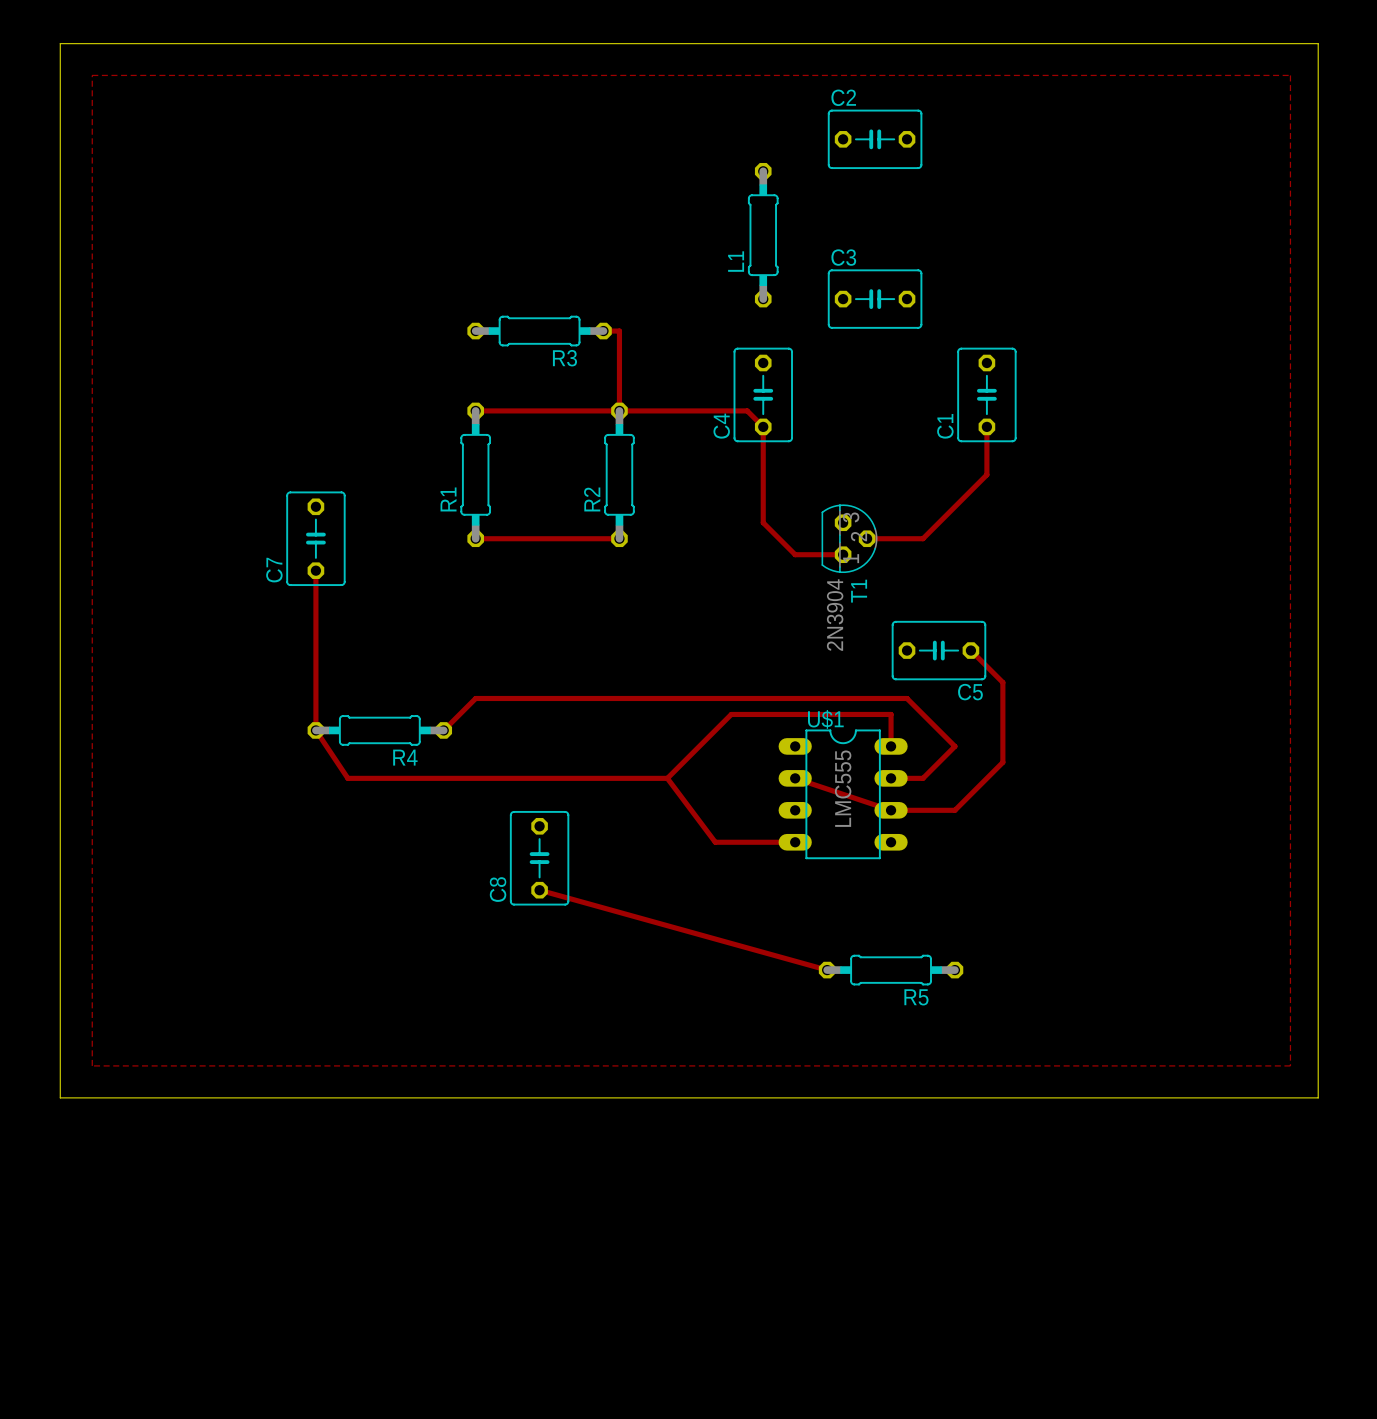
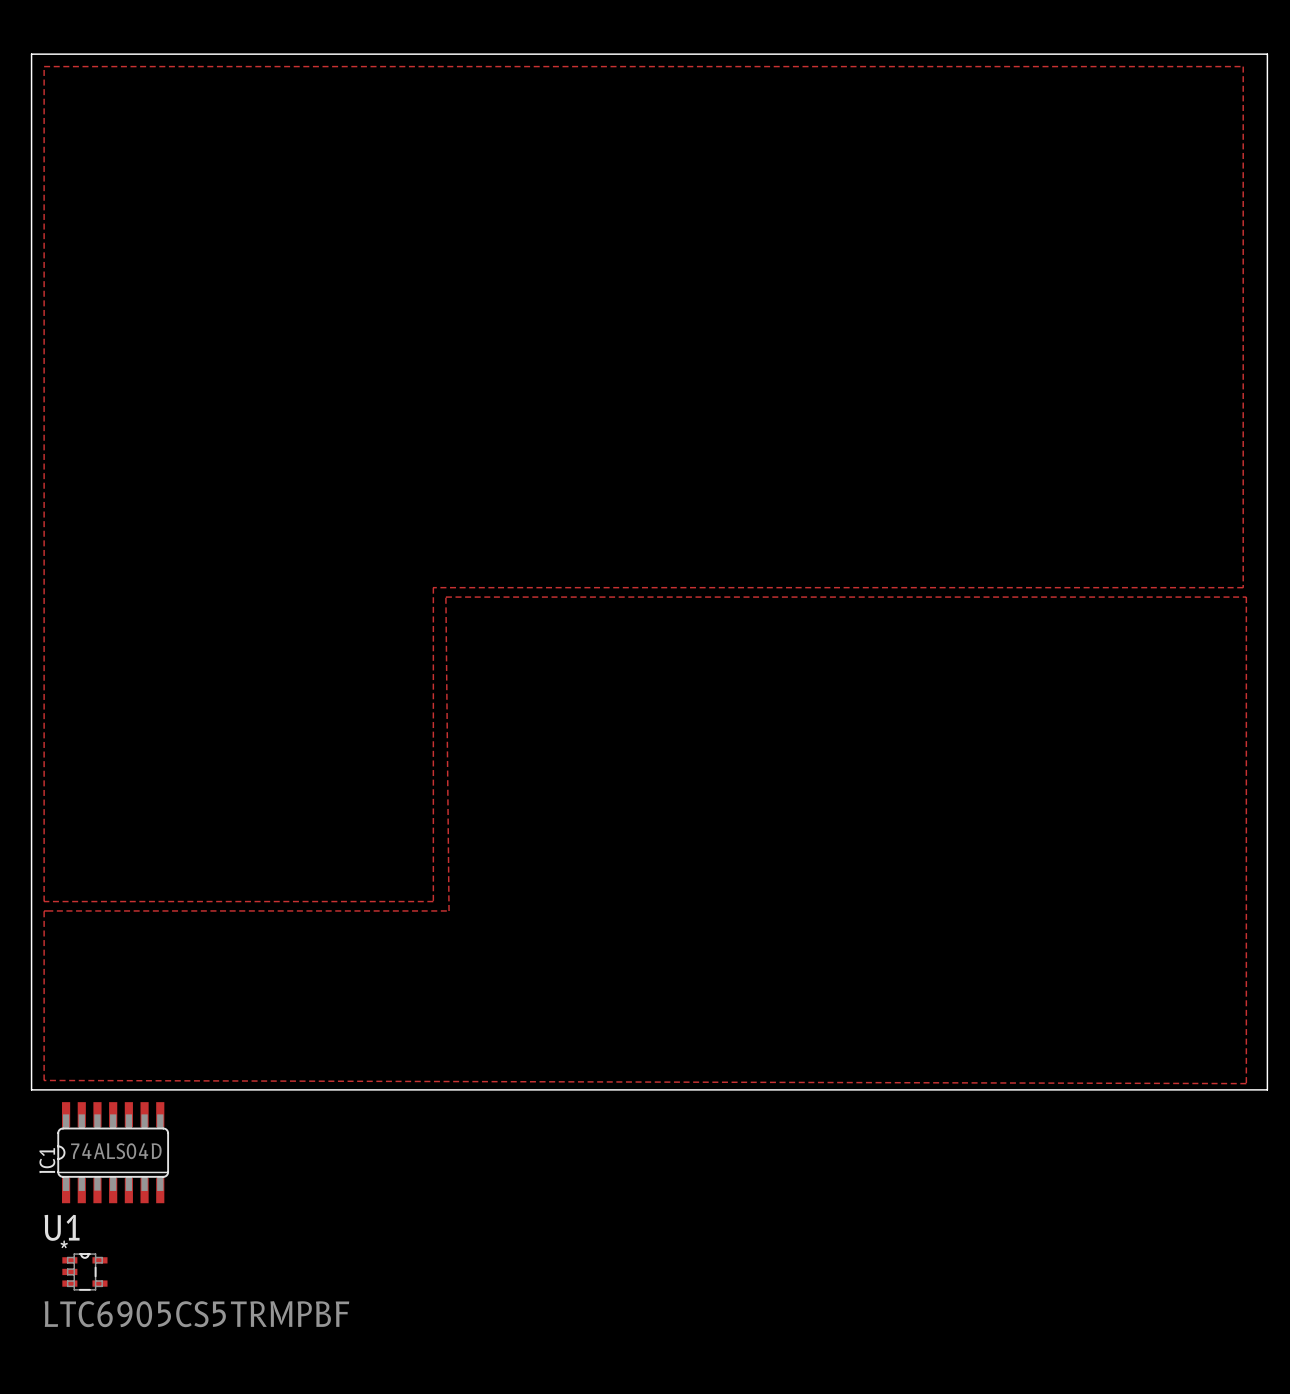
zone outline: (92, 75) (1290, 75) (1290, 1065) (92, 1065) (92, 75) -> (44, 66) (44, 901) (433, 901) (433, 587) (1243, 587) (1243, 66) (44, 66)
C2: (875, 139) -> none
L1: (763, 235) -> none
C3: (875, 299) -> none
R3: (539, 331) -> none
track: (603, 331) (619, 331) (619, 410) -> none
C4: (763, 394) -> none
C1: (986, 394) -> none
track: (475, 410) (747, 410) (763, 426) (763, 522) (795, 554) (843, 554) -> none
track: (986, 426) (986, 474) (923, 538) (868, 538) -> none
R1: (475, 474) -> none
R2: (619, 474) -> none
C7: (315, 538) -> none
track: (475, 538) (619, 538) -> none
T1: 2N3904 (849, 538) -> none
track: (315, 570) (315, 730) (347, 778) (667, 778) -> none
zone outline: none -> (445, 597) (449, 910) (44, 910) (44, 1080) (1246, 1083) (1246, 597) (445, 597)
C5: (938, 650) -> none
track: (970, 650) (1002, 682) (1002, 762) (954, 810) (891, 810) (795, 778) -> none
R4: (379, 730) -> none
track: (443, 730) (475, 698) (907, 698) (954, 746) (923, 778) (891, 778) -> none
track: (891, 746) (891, 714) (731, 714) (667, 778) -> none
track: (667, 778) (715, 842) (795, 842) -> none
U$1: LMC555 (843, 794) -> none
C8: (539, 858) -> none
track: (539, 890) (827, 970) -> none
R5: (891, 970) -> none
IC1: none -> 74ALS04D (113, 1152)
U1: none -> LTC6905CS5TRMPBF (84, 1271)

